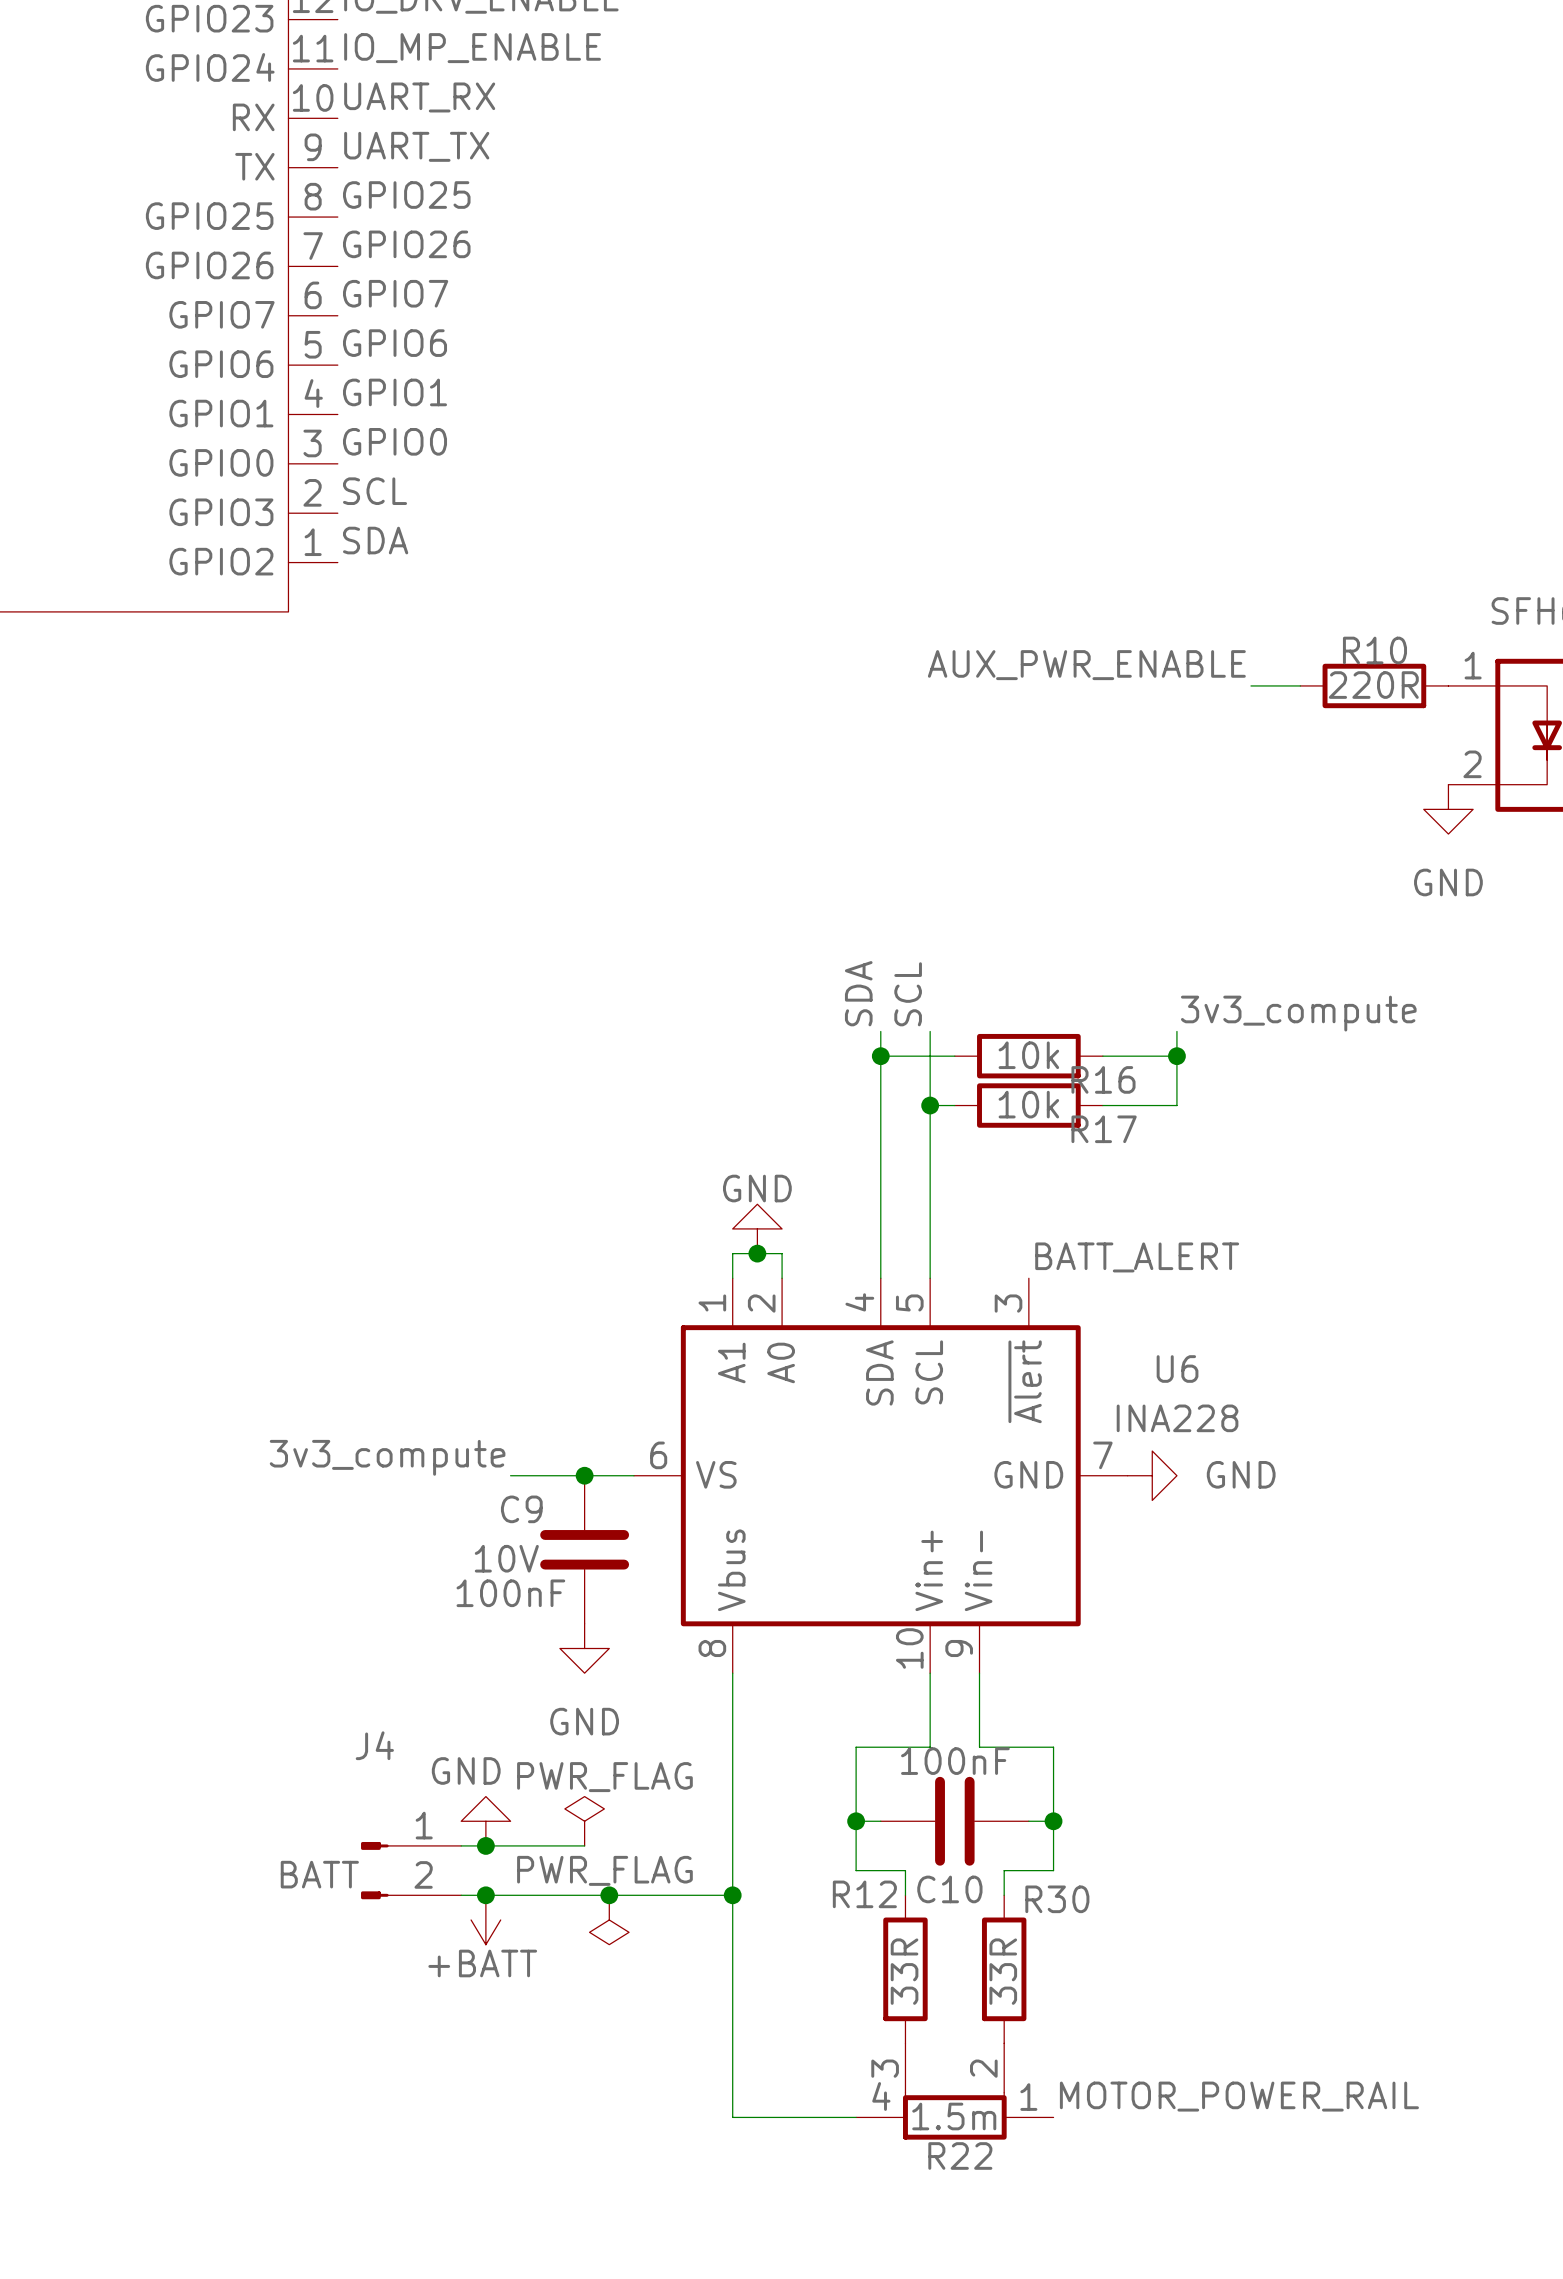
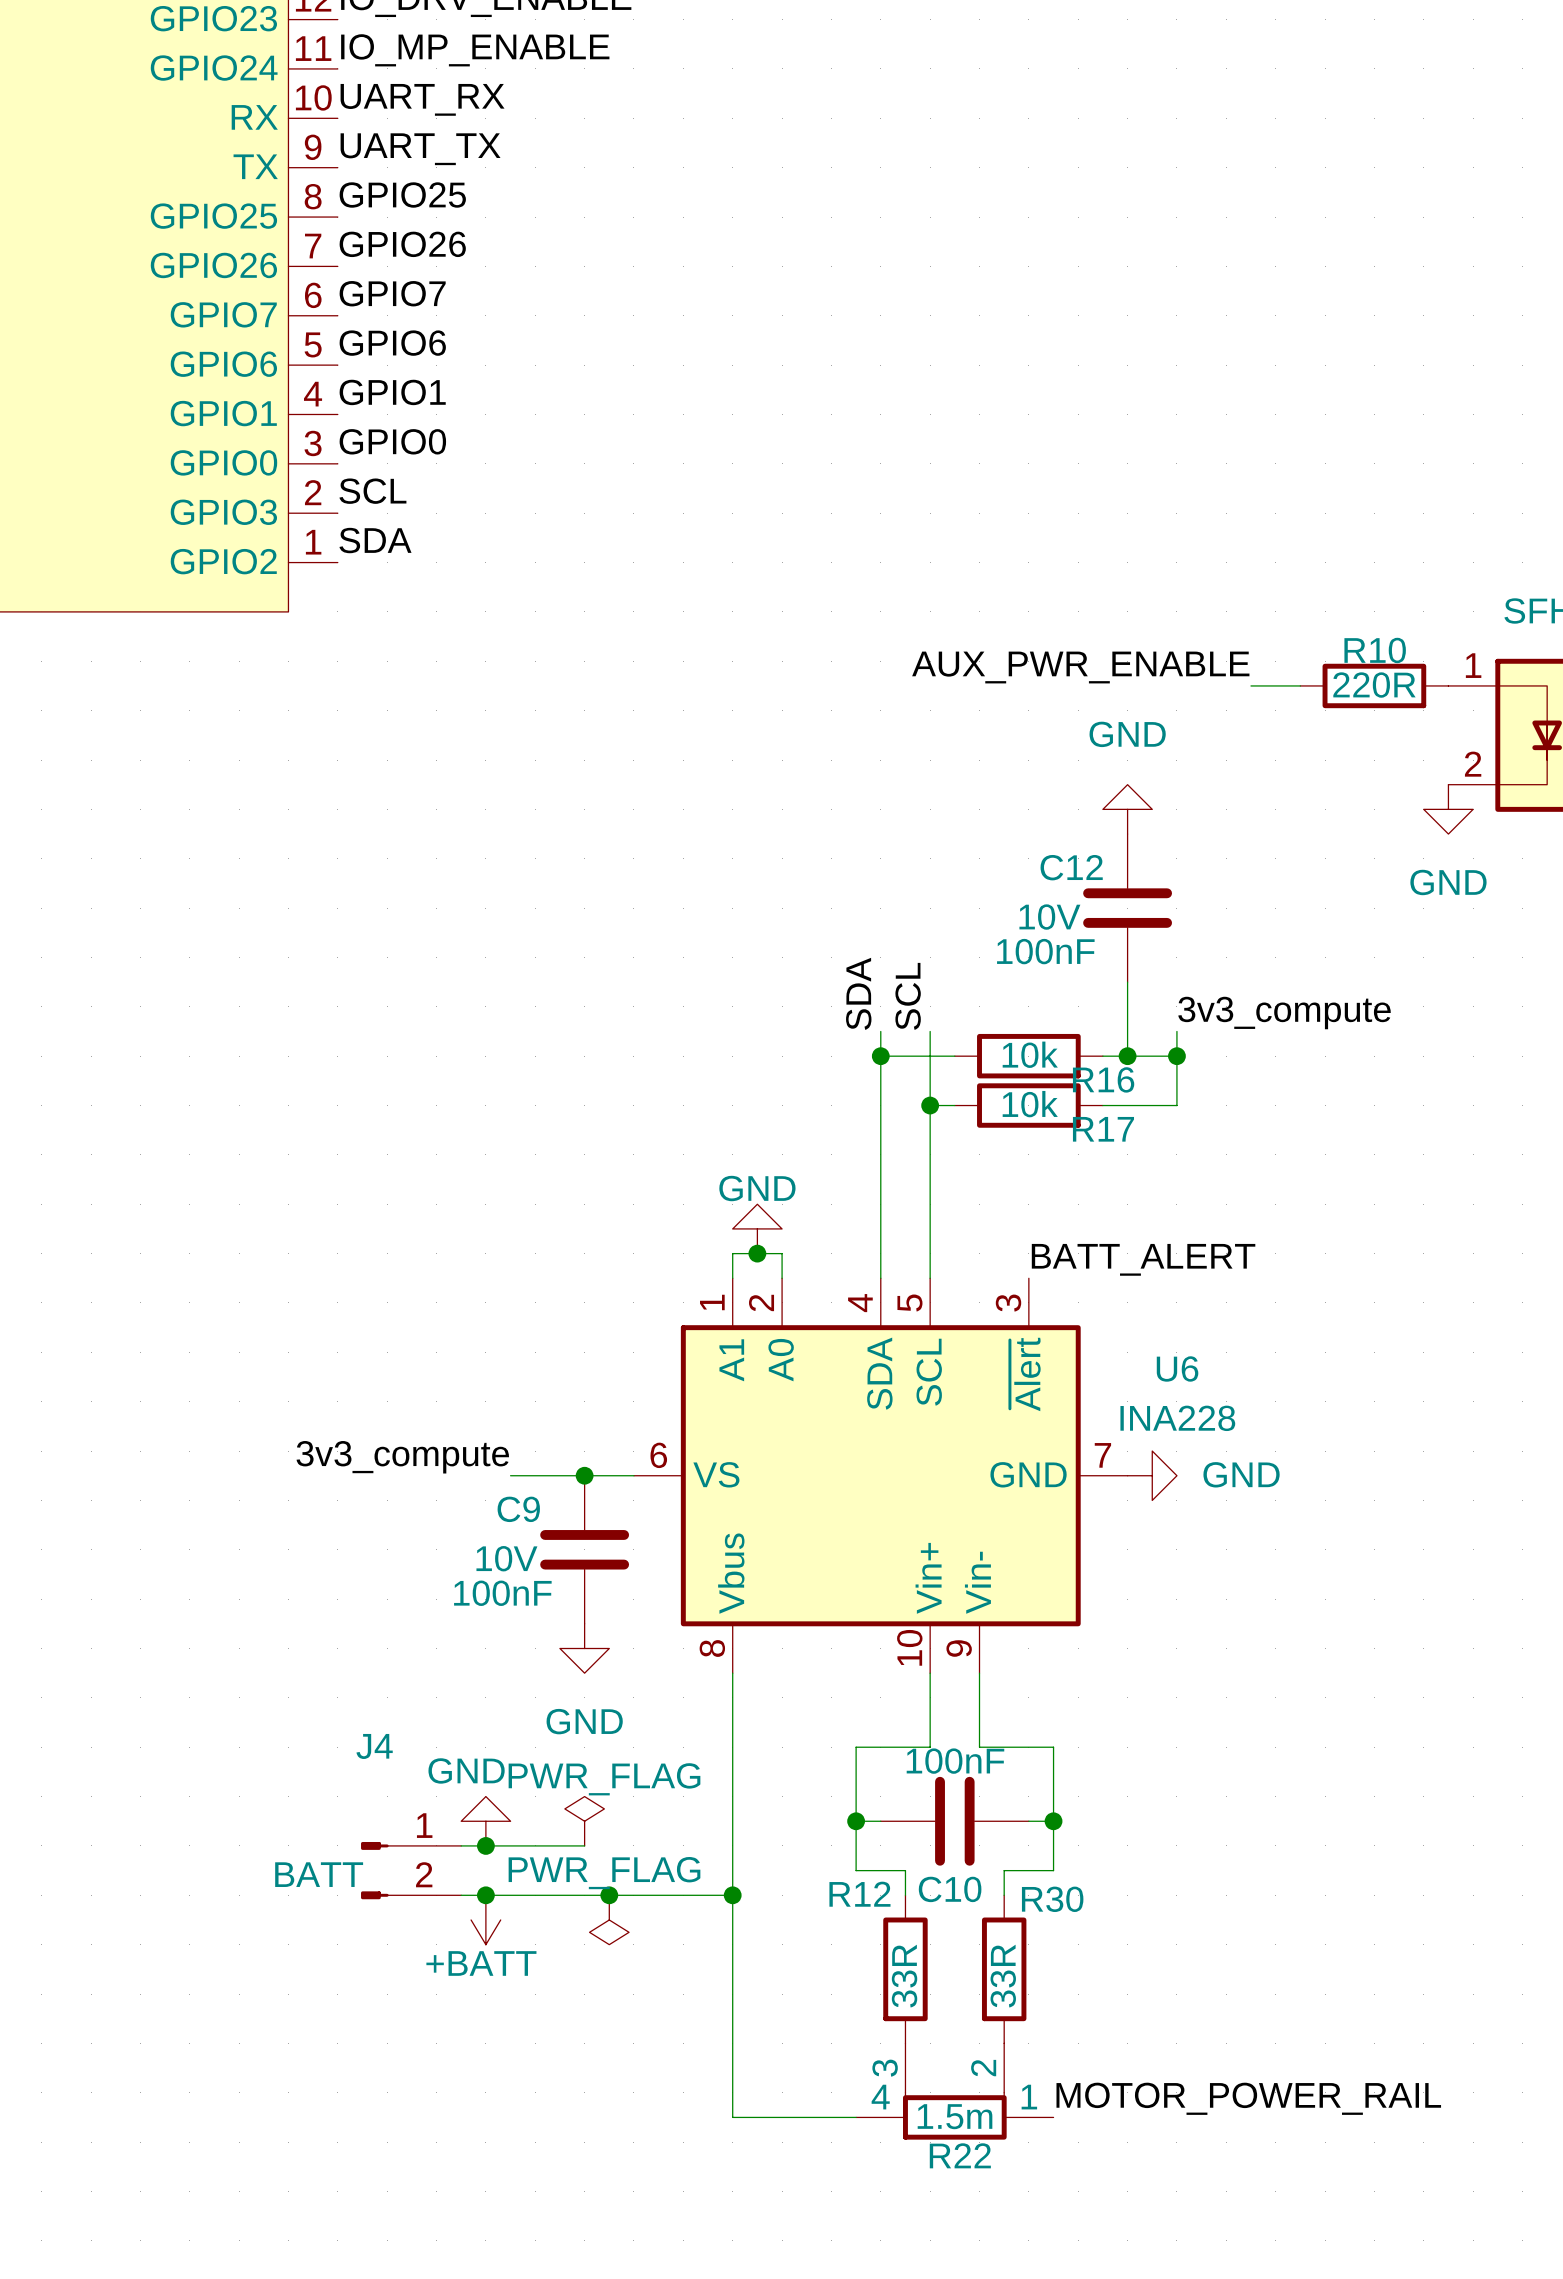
power symbol: none -> GND (1127, 809)
C12: none -> 100nF (1127, 908)
wire: none -> (1127, 982) (1127, 1056)
junction: none -> (1127, 1056)

